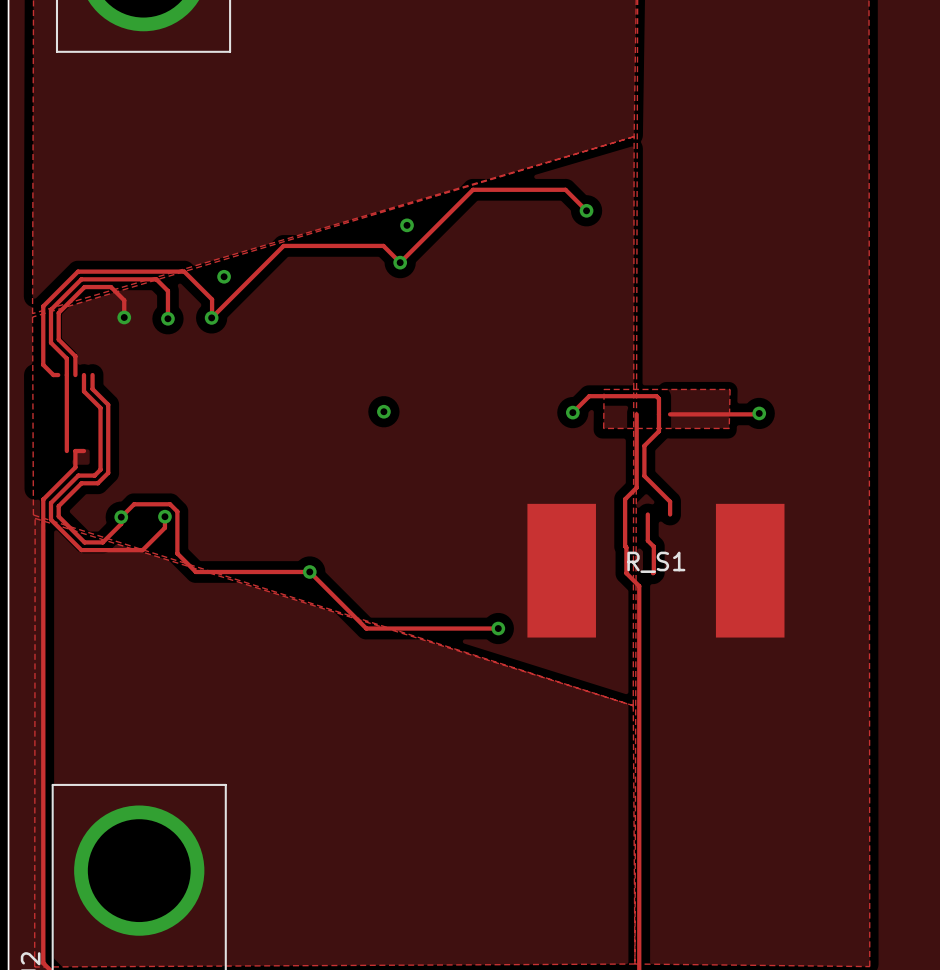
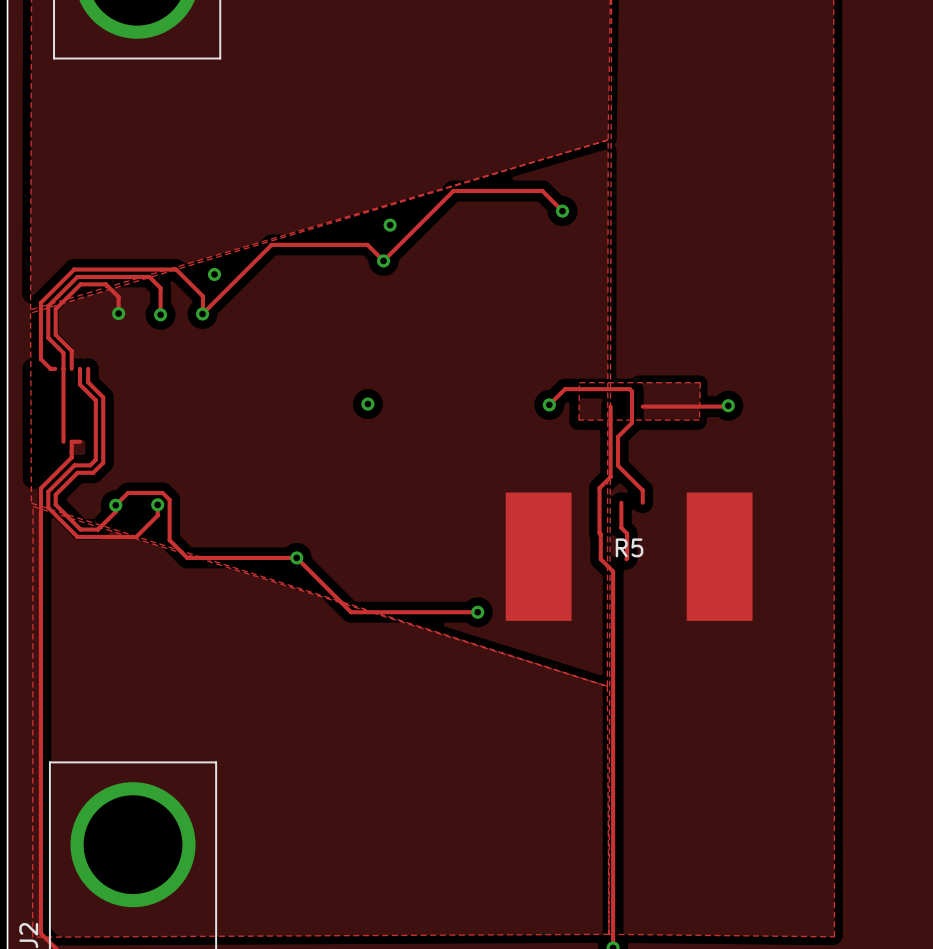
R_S1 name: R_S1 (656, 562) -> R5 (629, 547)

